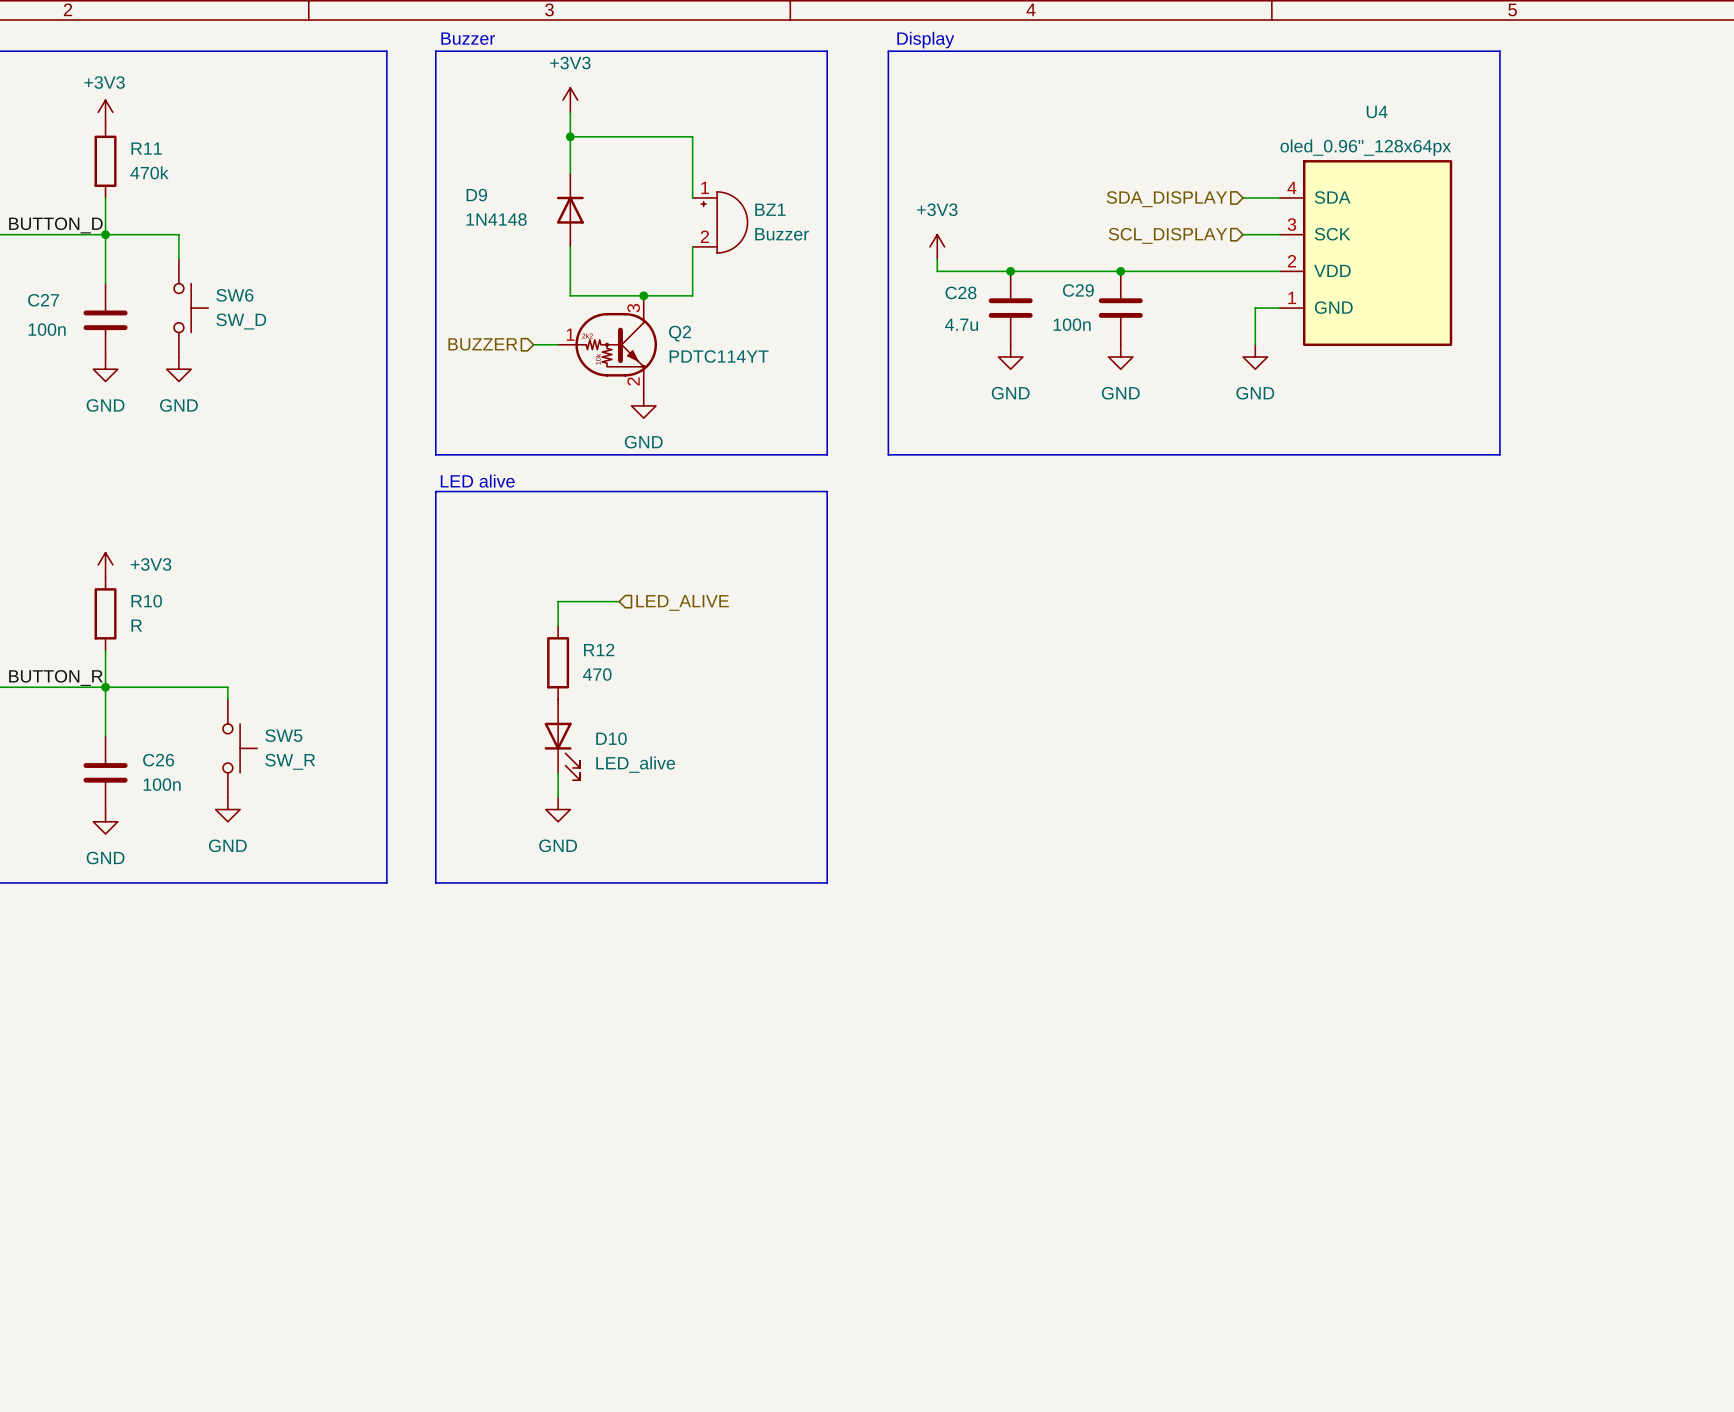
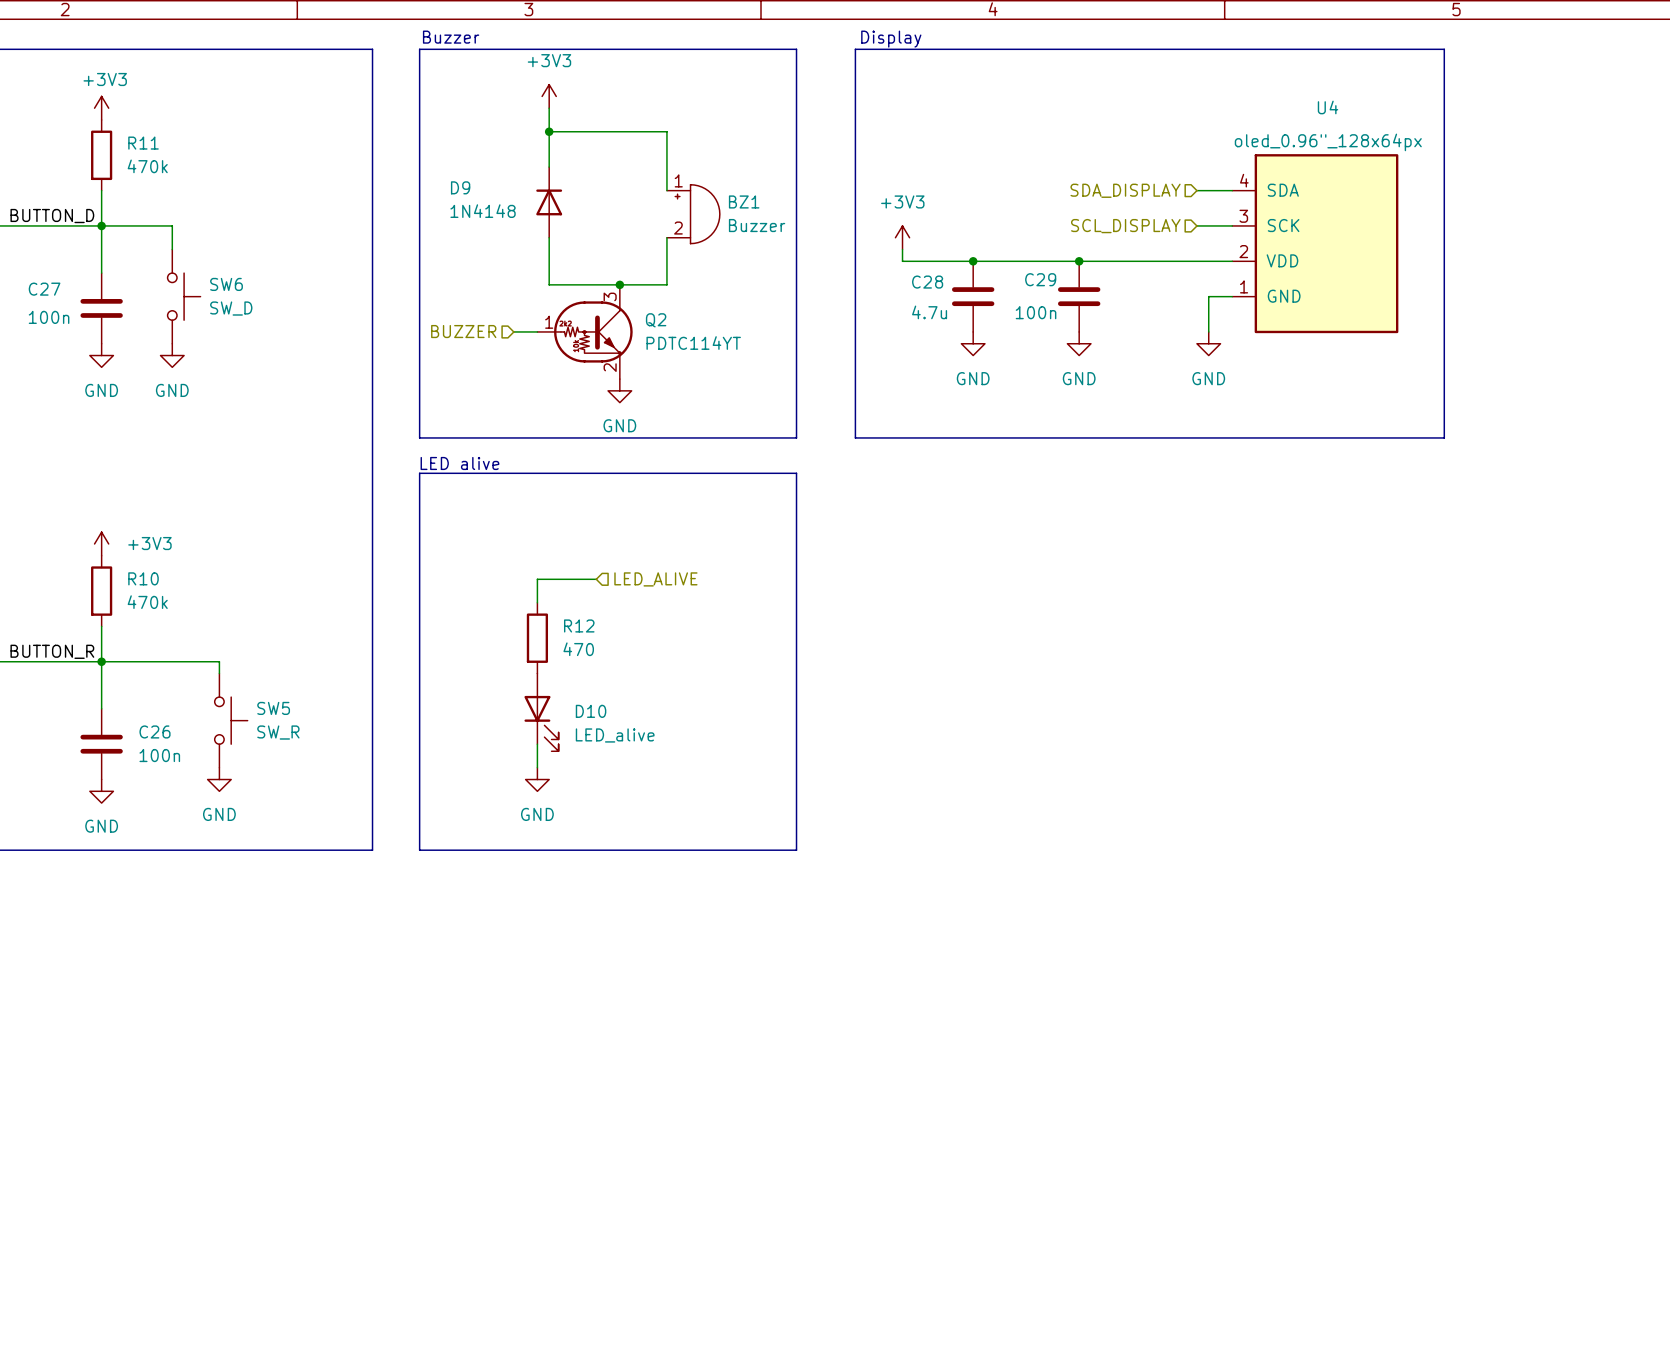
R10 value: R (136, 625) -> 470k (147, 602)

